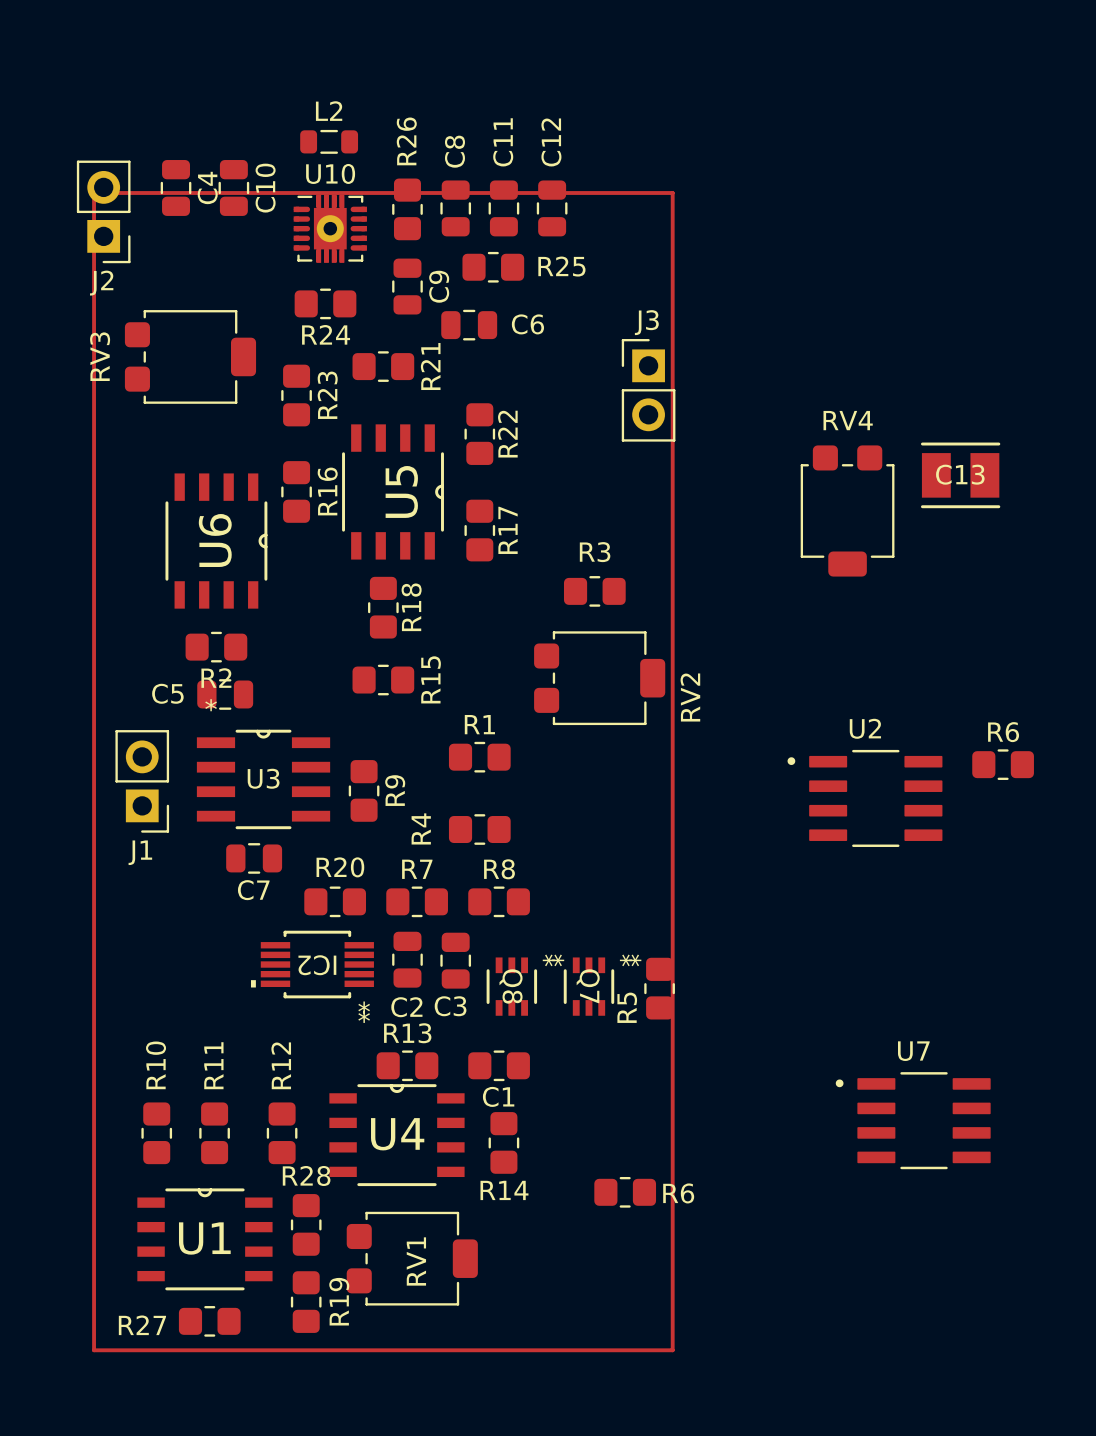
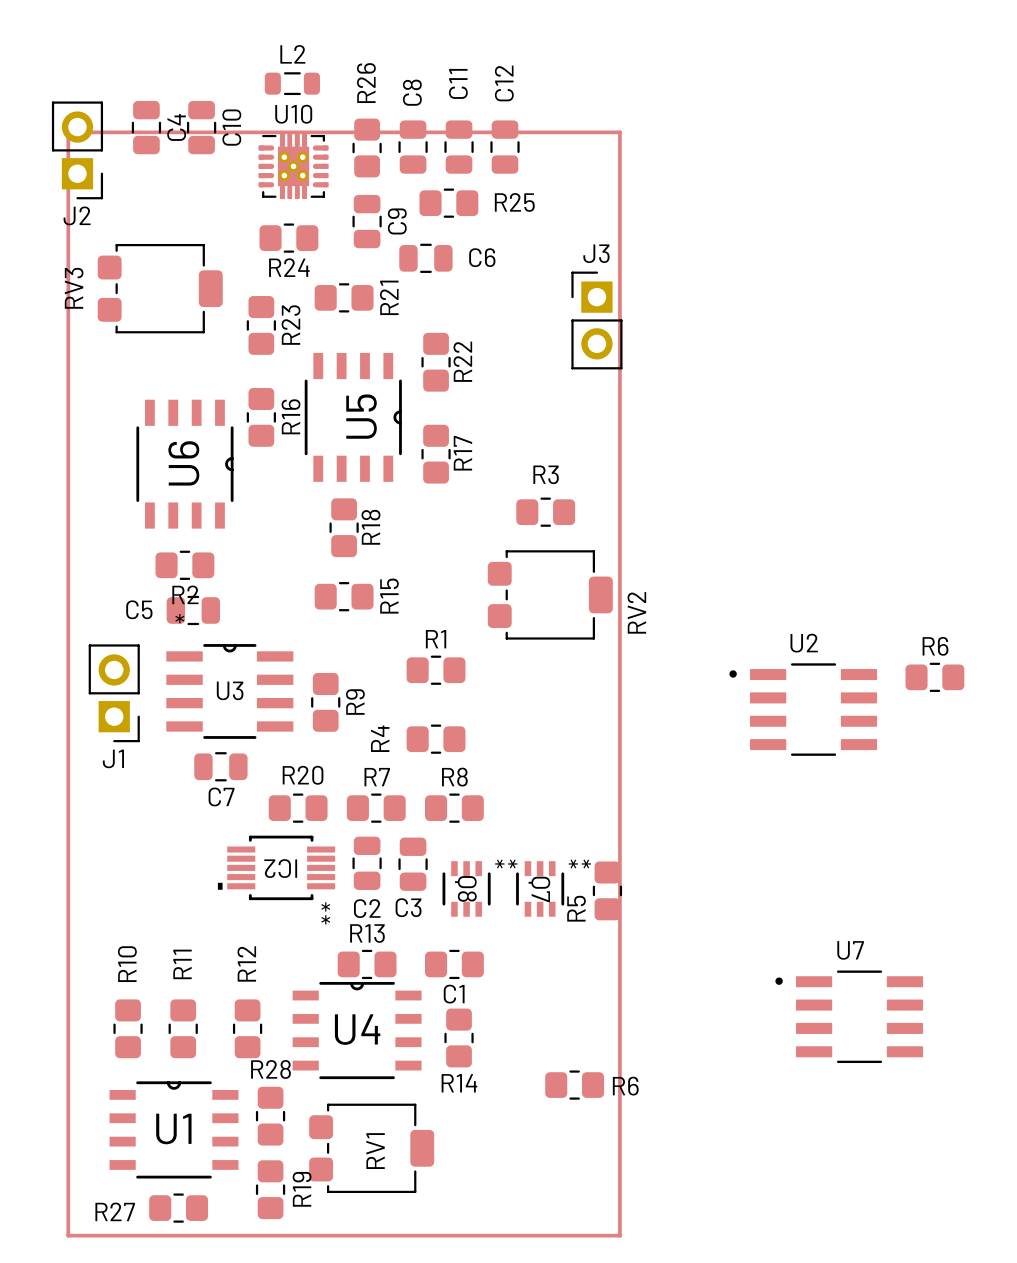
U10 footprint: [293, 194, 367, 263] -> [258, 133, 329, 200]
C13: (960, 475) -> none
RV4: (847, 510) -> none

